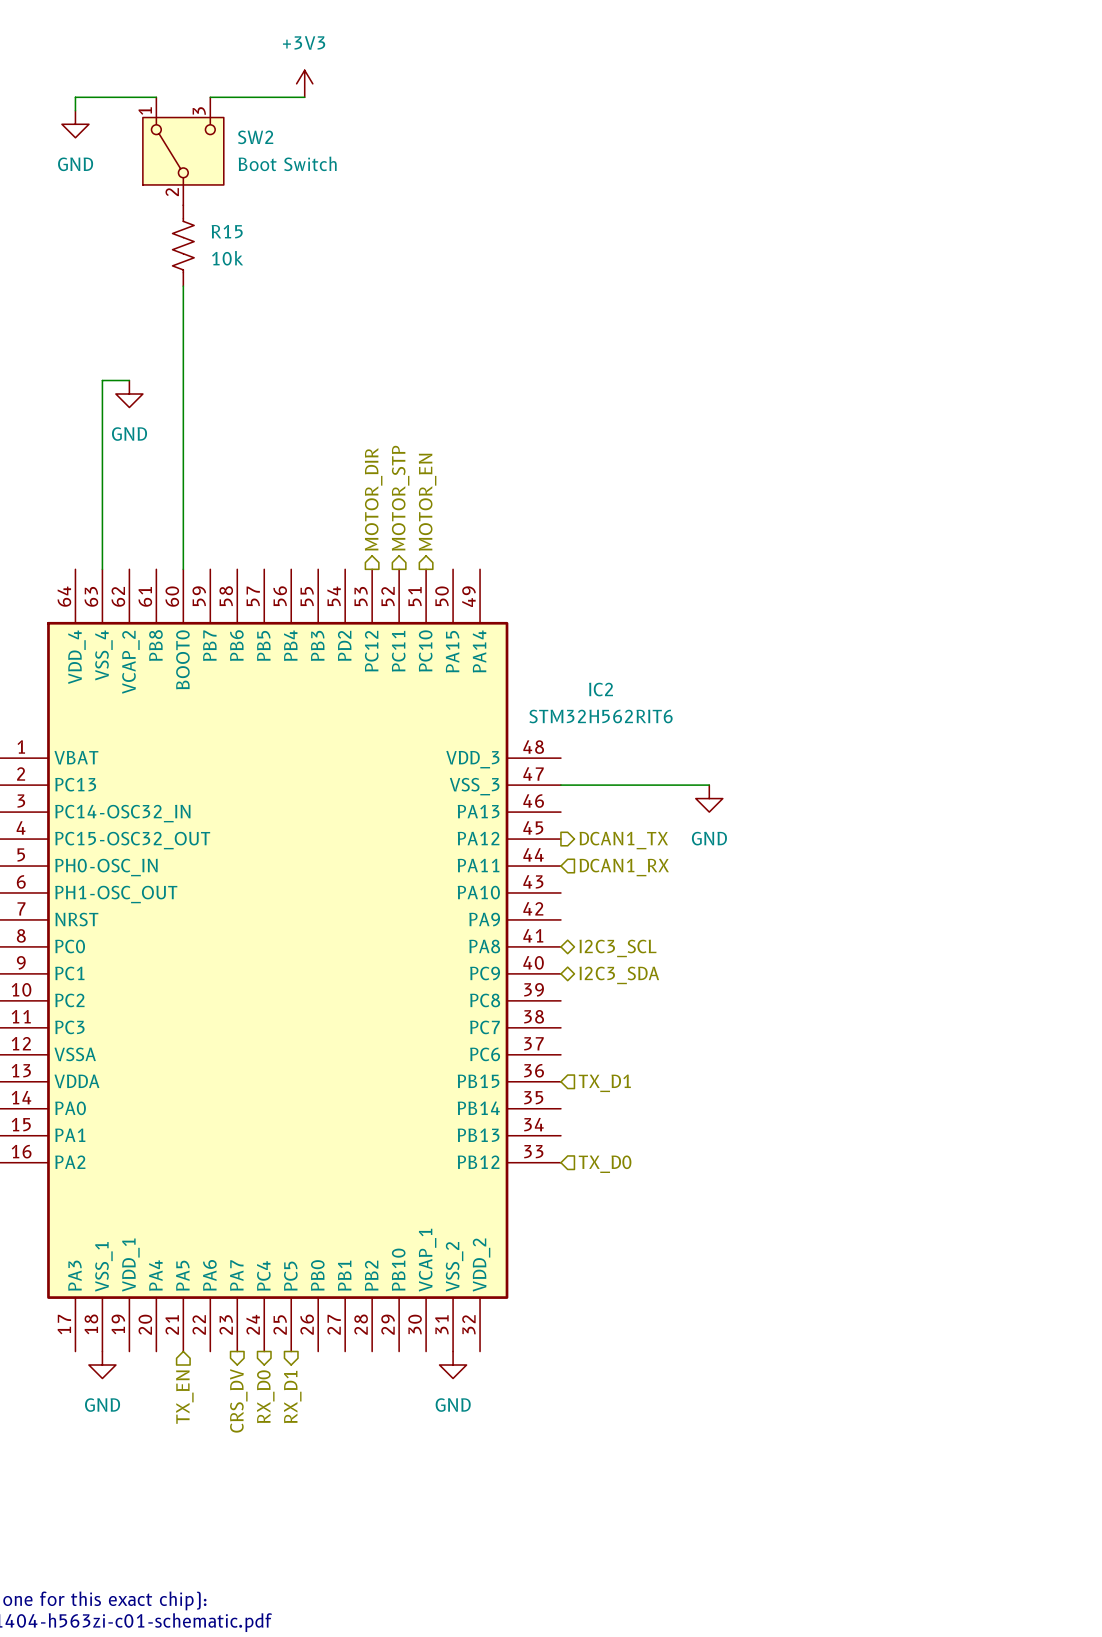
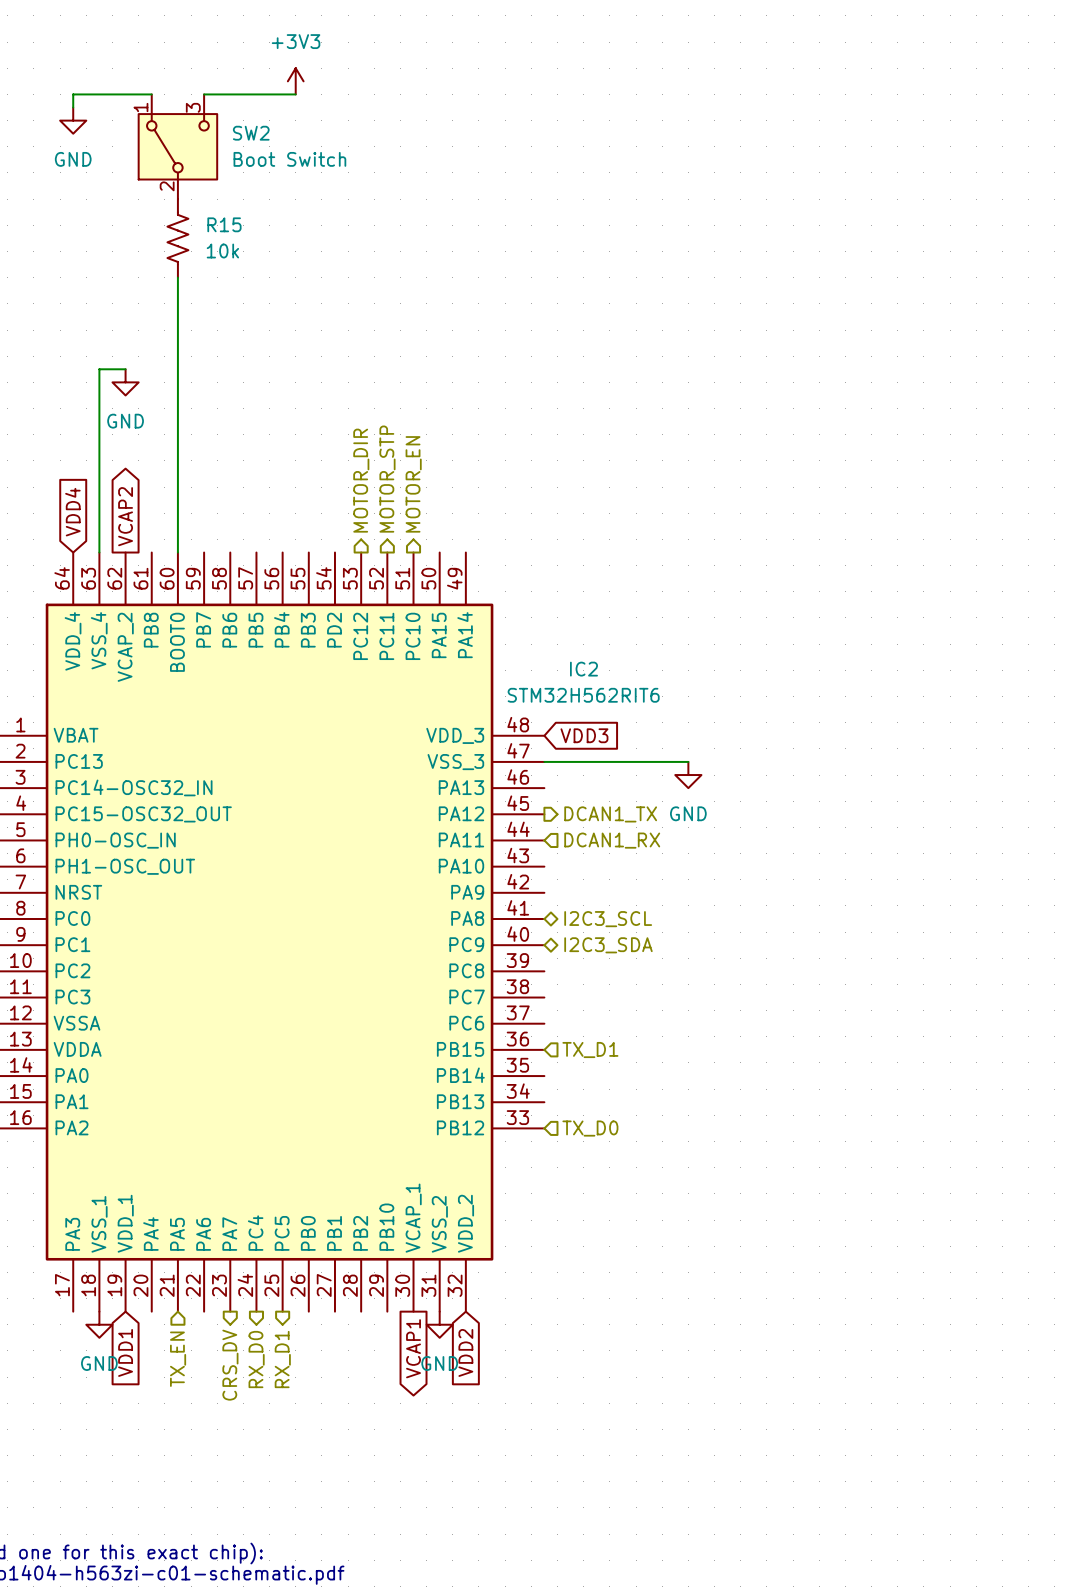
global label: none -> VDD4 (72, 512)
global label: none -> VCAP2 (125, 516)
global label: none -> VDD3 (584, 735)
global label: none -> VCAP1 (413, 1348)
global label: none -> VDD1 (125, 1352)
global label: none -> VDD2 (465, 1352)

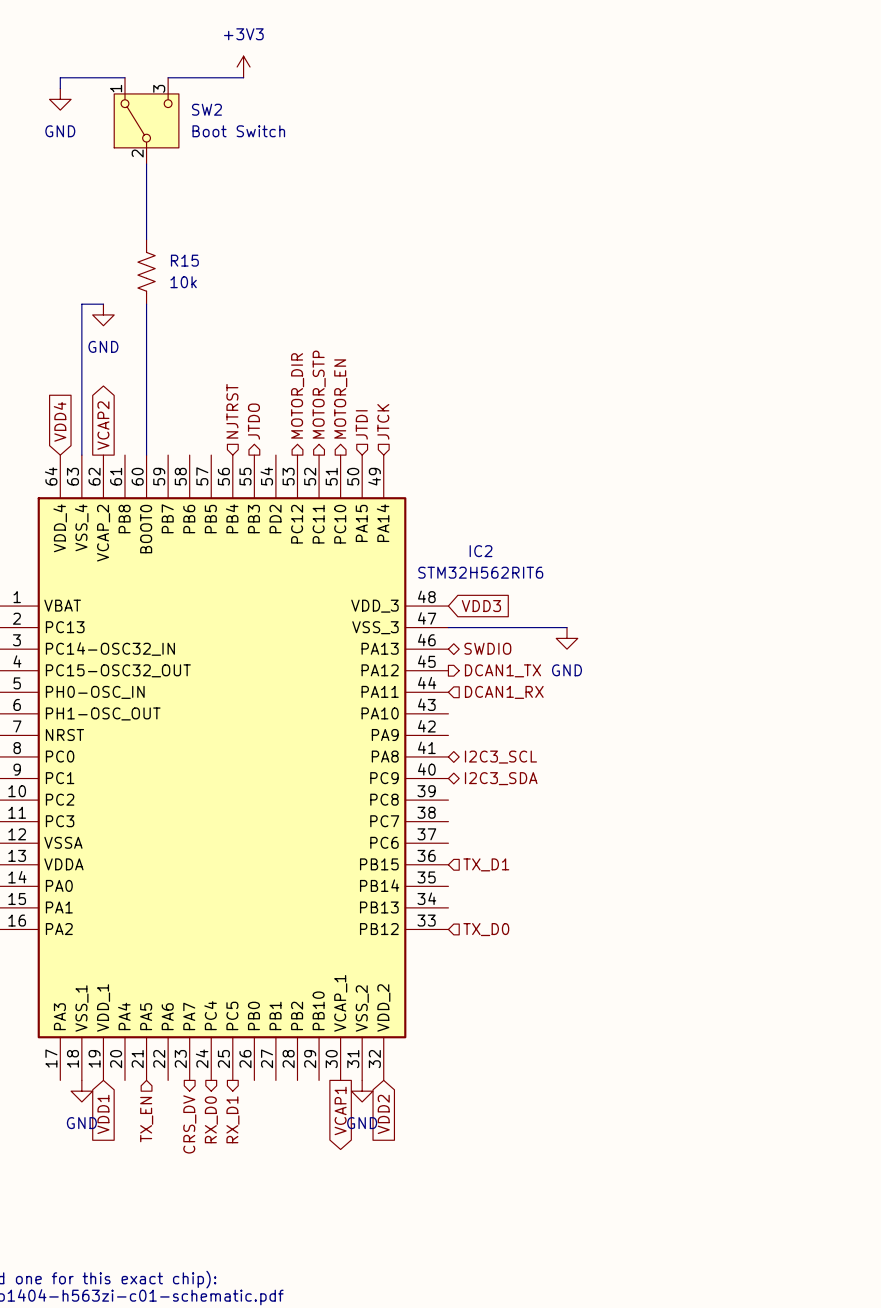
R15 position: (177, 238) -> (146, 271)
hierarchical label: none -> NJTRST (232, 411)
hierarchical label: none -> JTDO (253, 421)
hierarchical label: none -> JTCK (383, 421)
hierarchical label: none -> JTDI (361, 424)
hierarchical label: none -> SWDIO (487, 648)

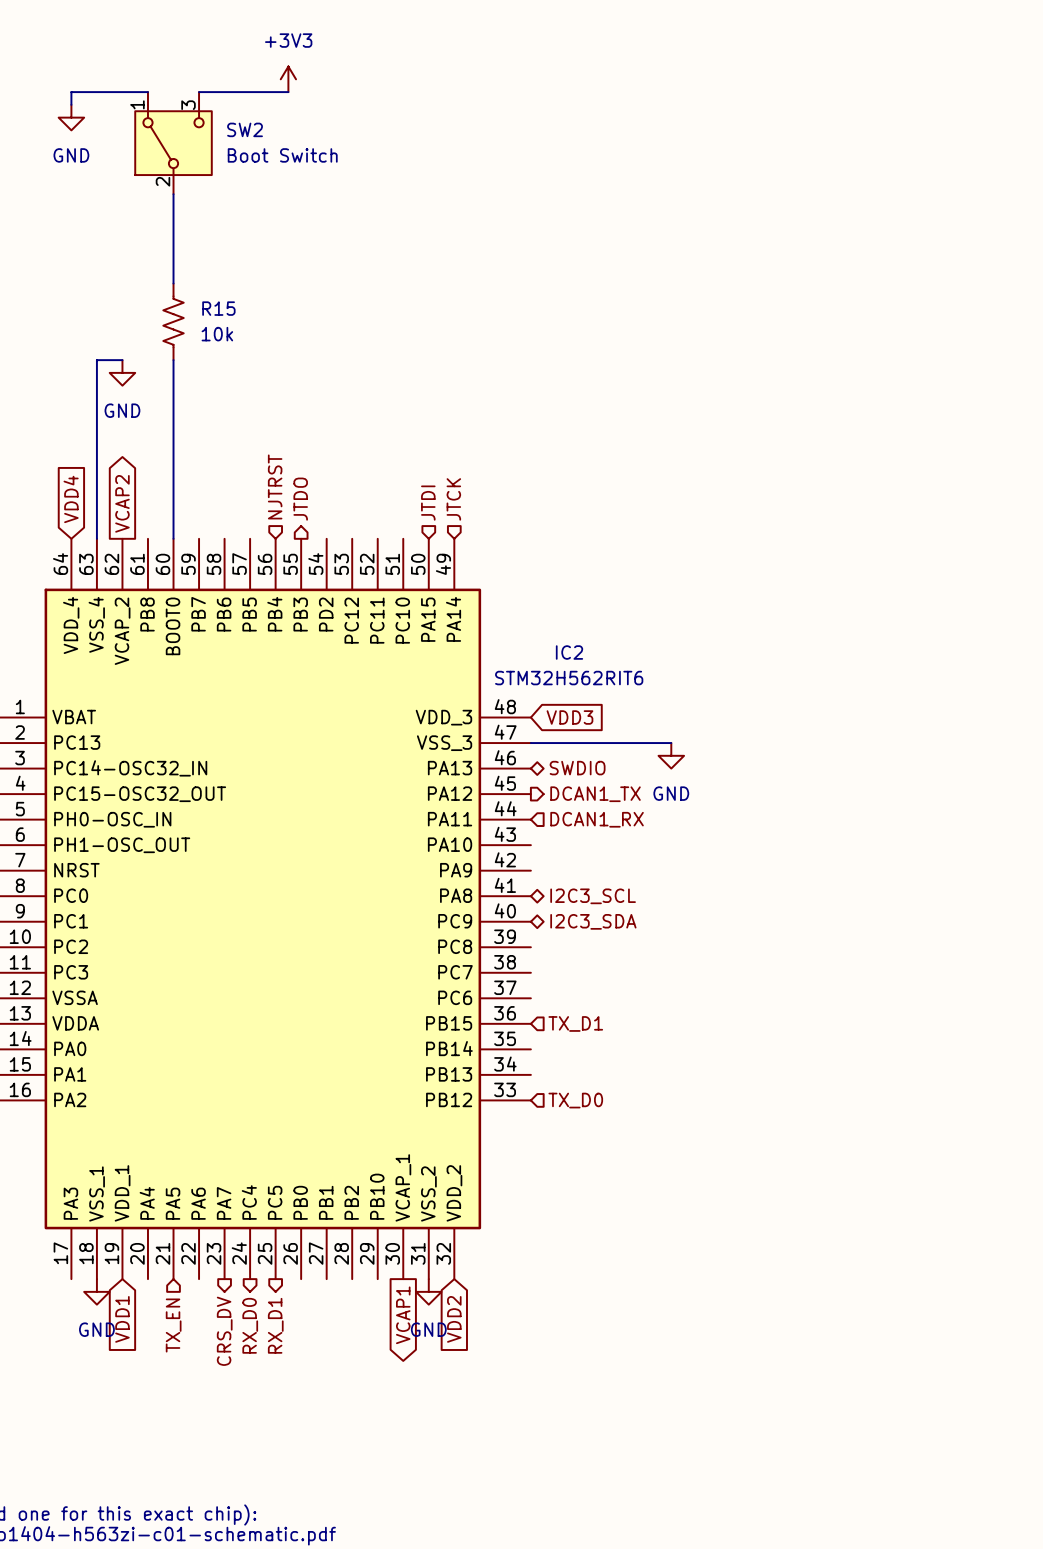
hierarchical label: MOTOR_STP (319, 394) -> none
hierarchical label: MOTOR_DIR (297, 395) -> none
hierarchical label: MOTOR_EN (340, 398) -> none

